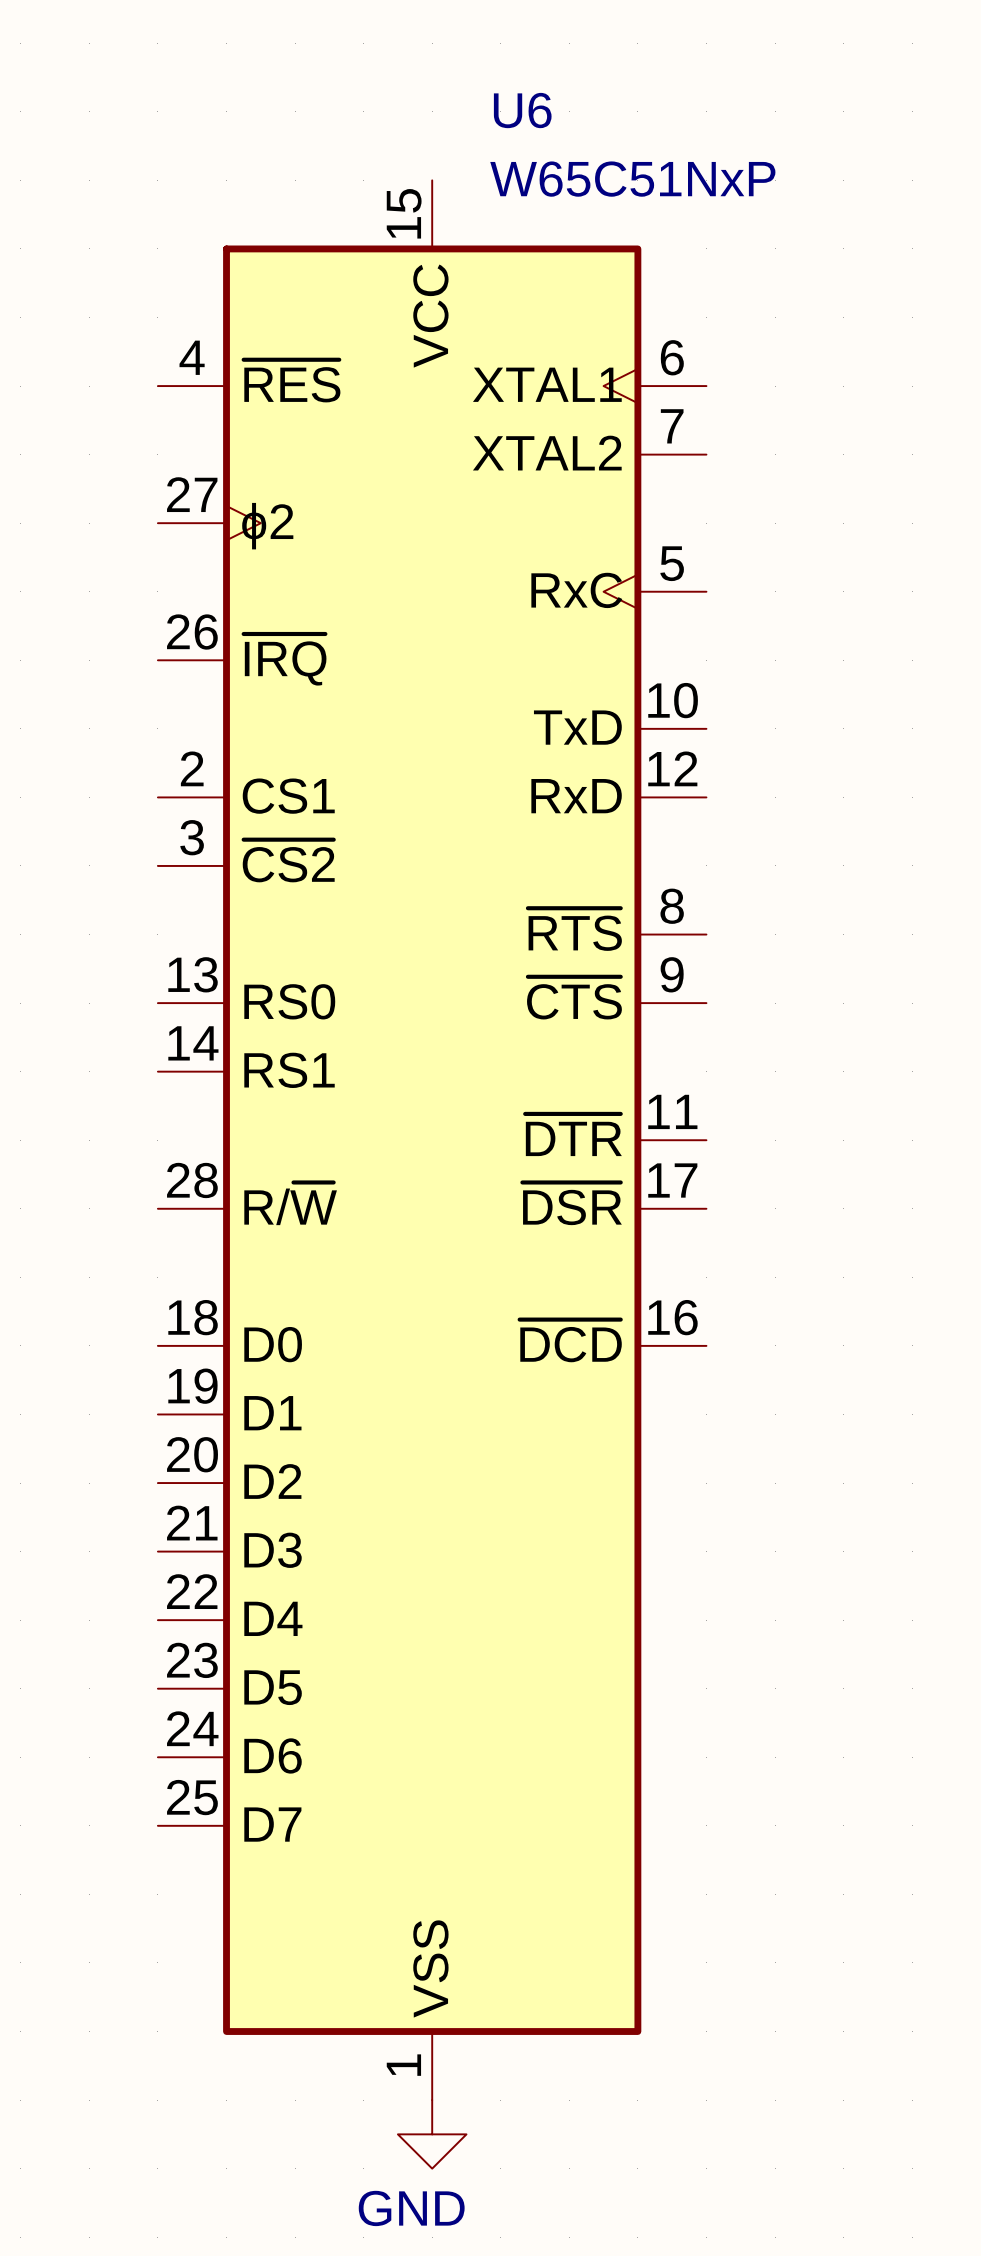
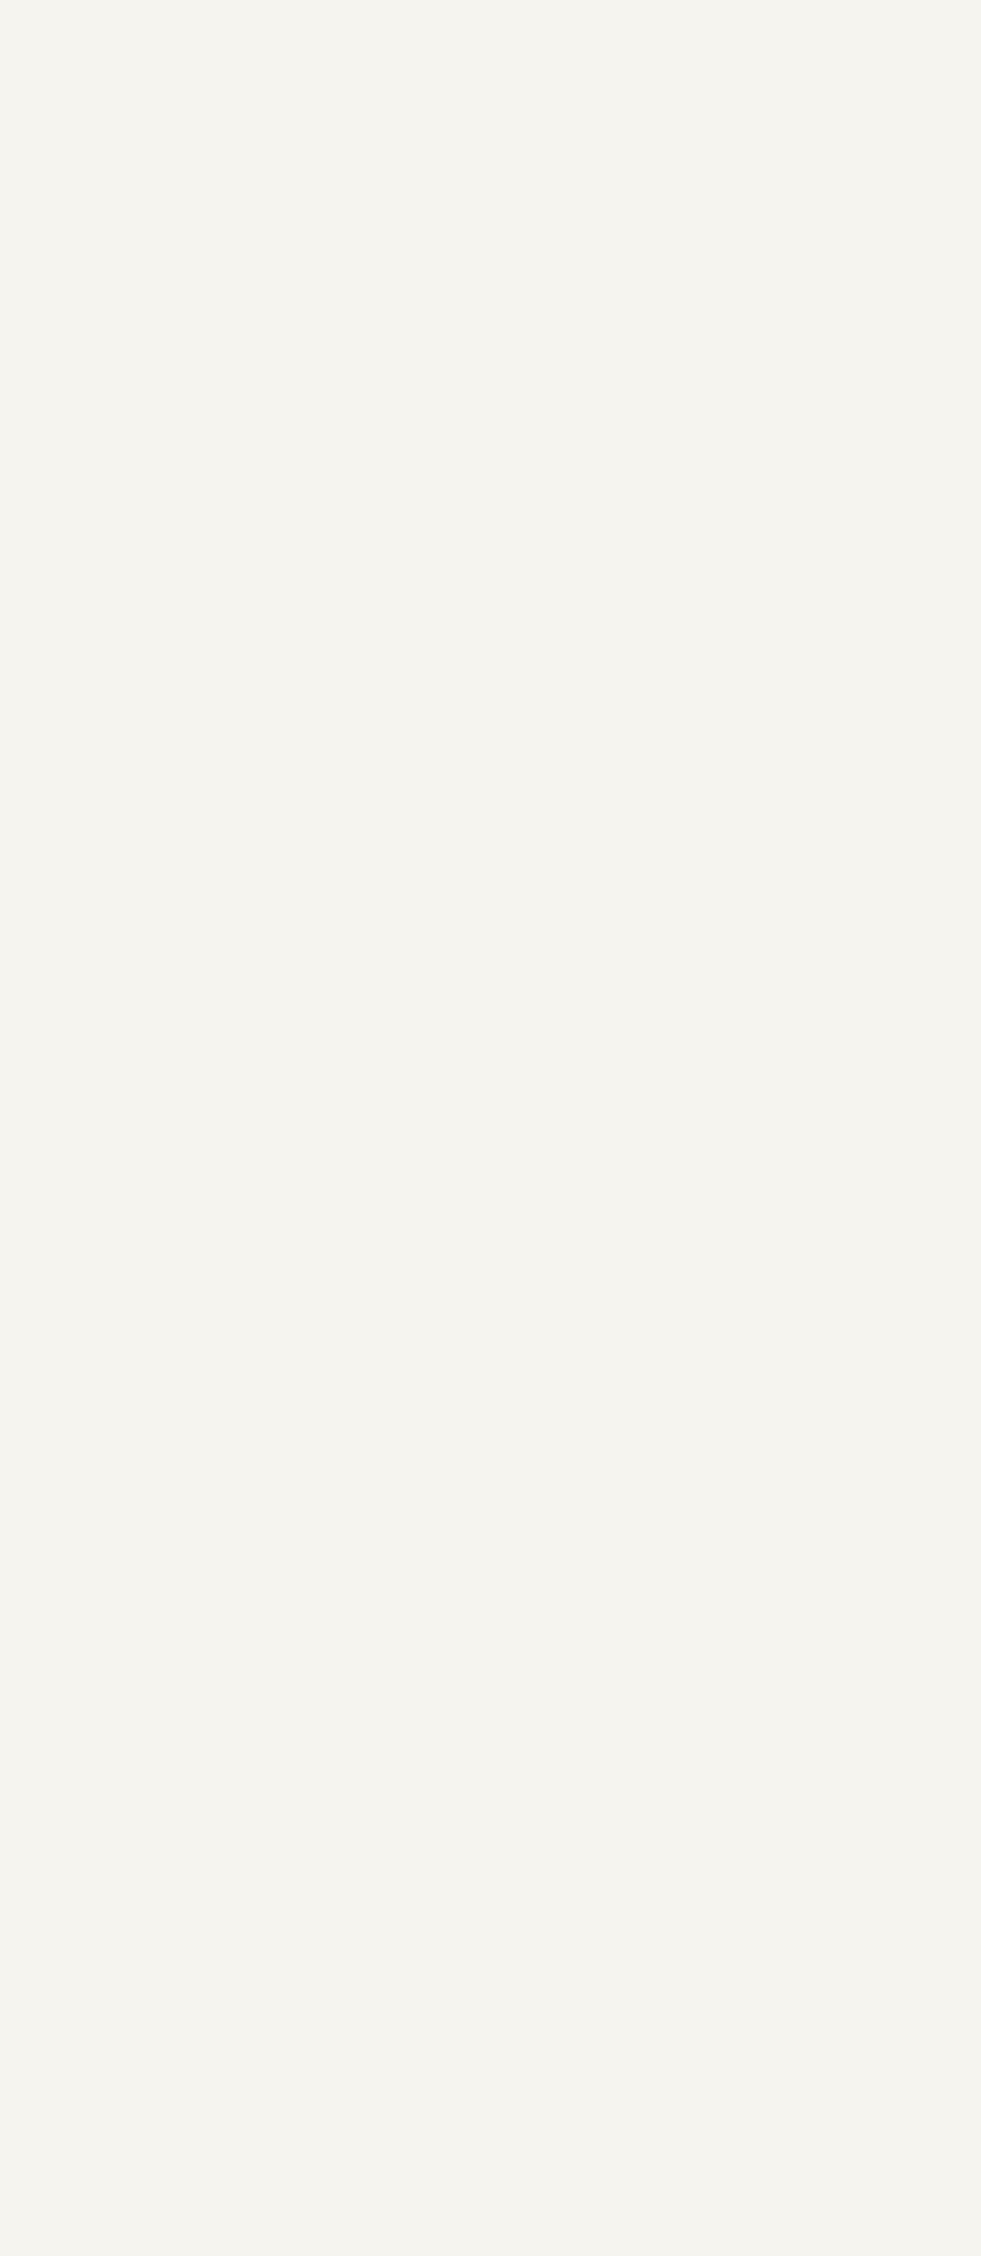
U6: W65C51NxP (432, 1140) -> none
power symbol: GND (432, 2134) -> none

